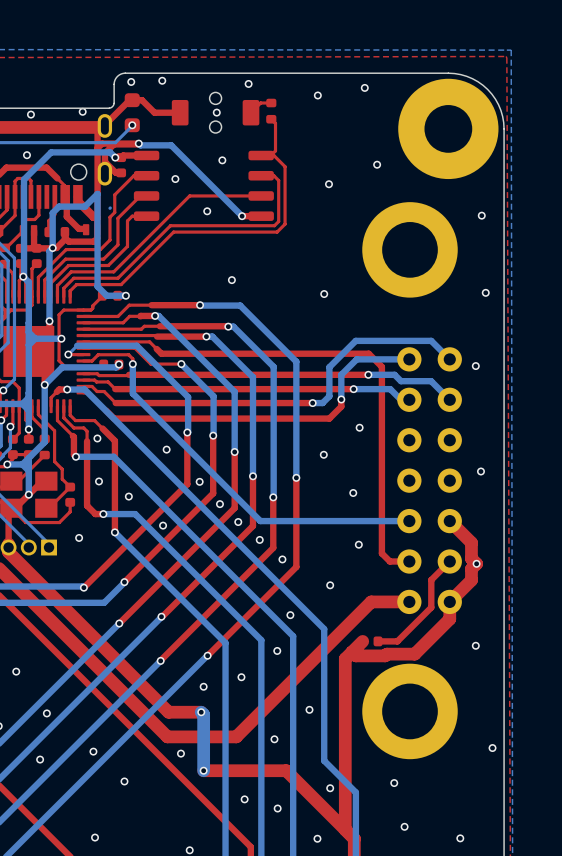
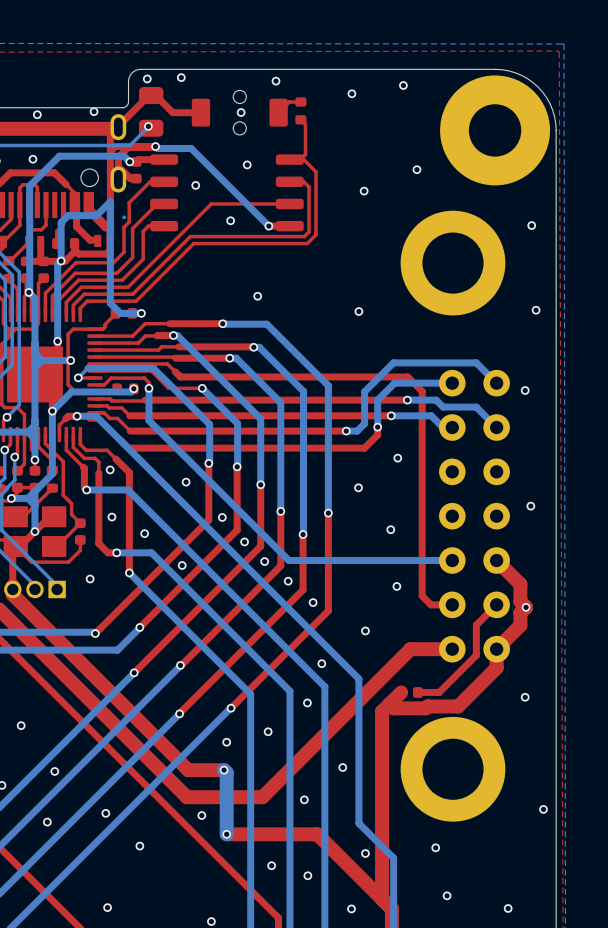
part footprint: [124, 93, 140, 133] -> [138, 87, 164, 137]

